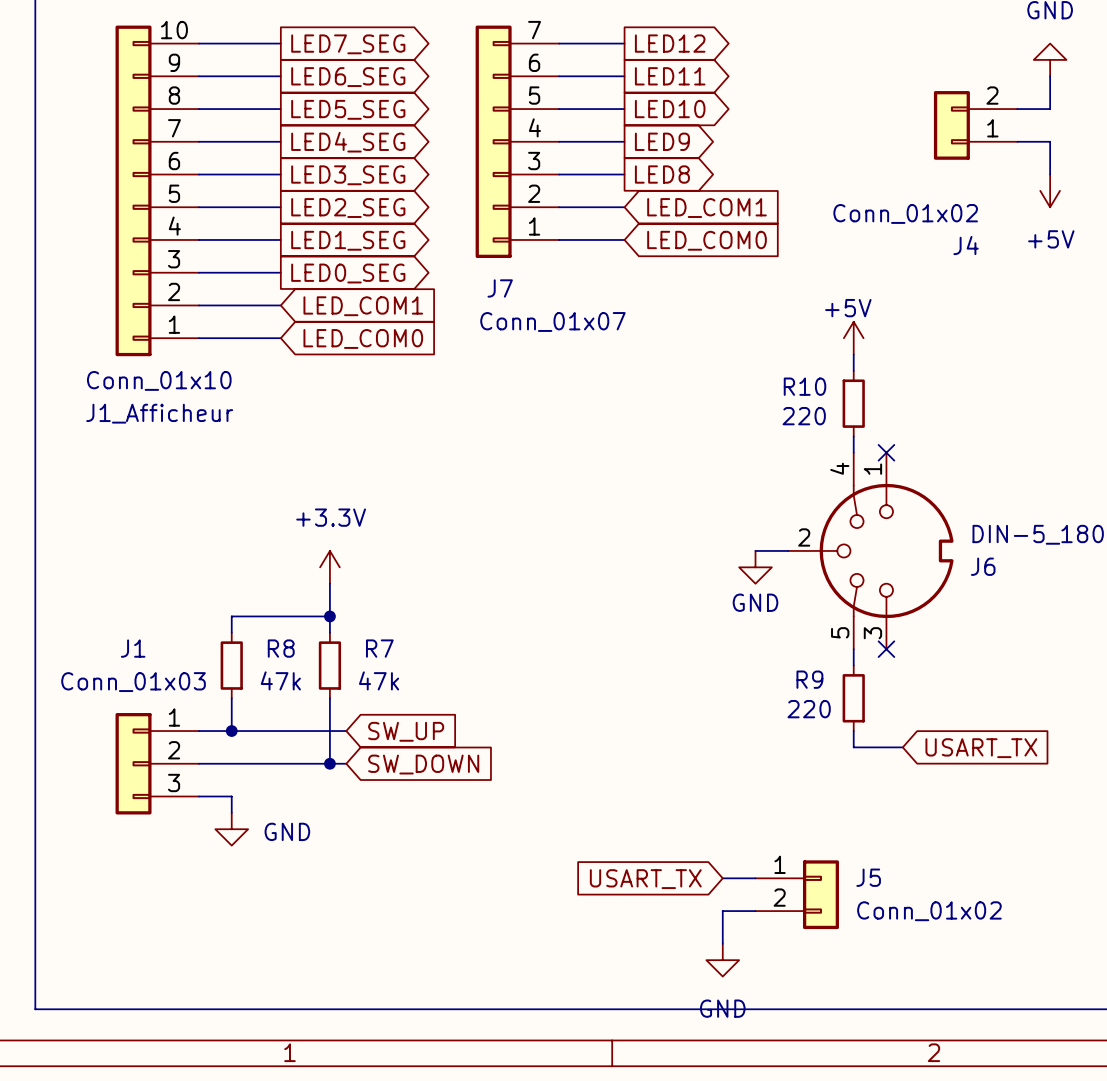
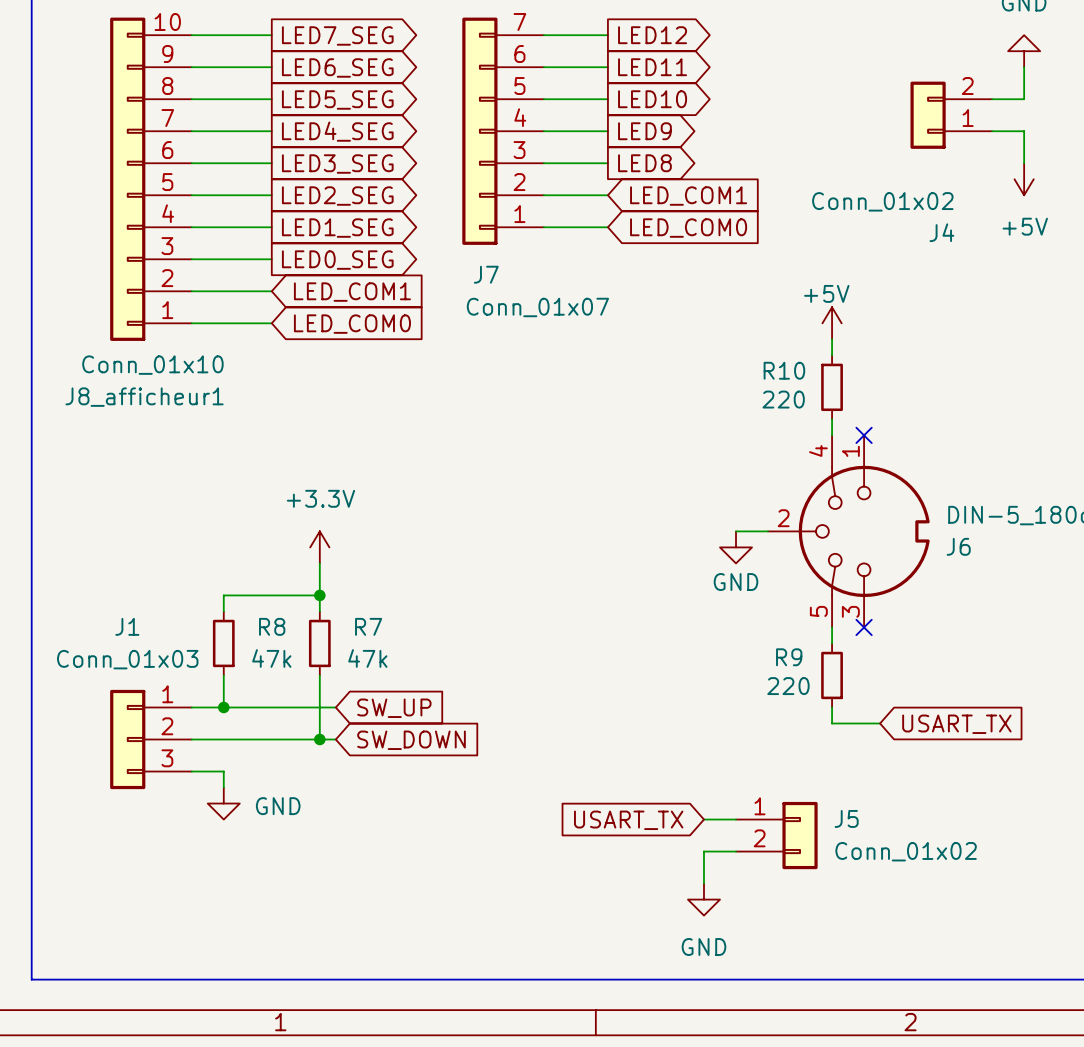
J1_Afficheur name: J1_Afficheur (159, 413) -> J8_afficheur1 (144, 397)
wire: none -> (703, 819) (736, 819)
wire: none -> (703, 851) (703, 883)
global label position: USART_TX (645, 879) -> USART_TX (628, 820)
J5 position: (797, 894) -> (776, 835)
wire: (755, 911) (722, 911) (722, 943) -> none
power symbol position: GND (722, 960) -> GND (703, 899)

